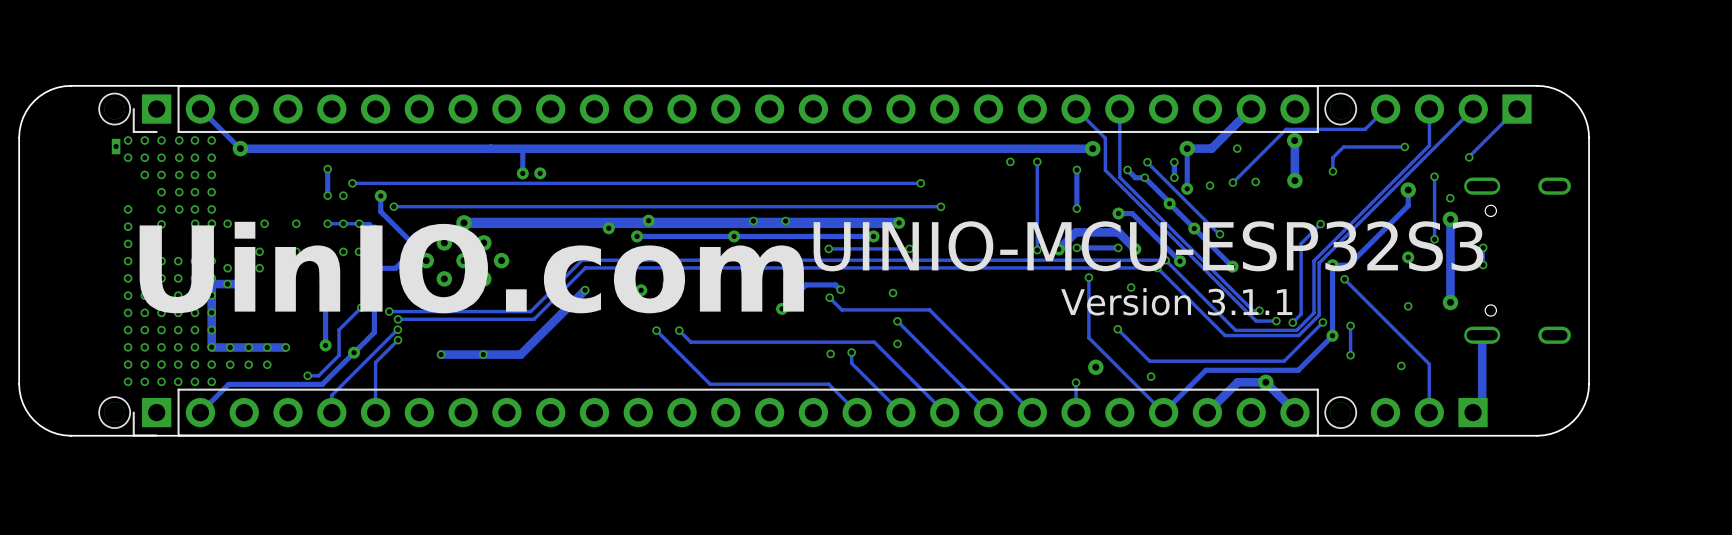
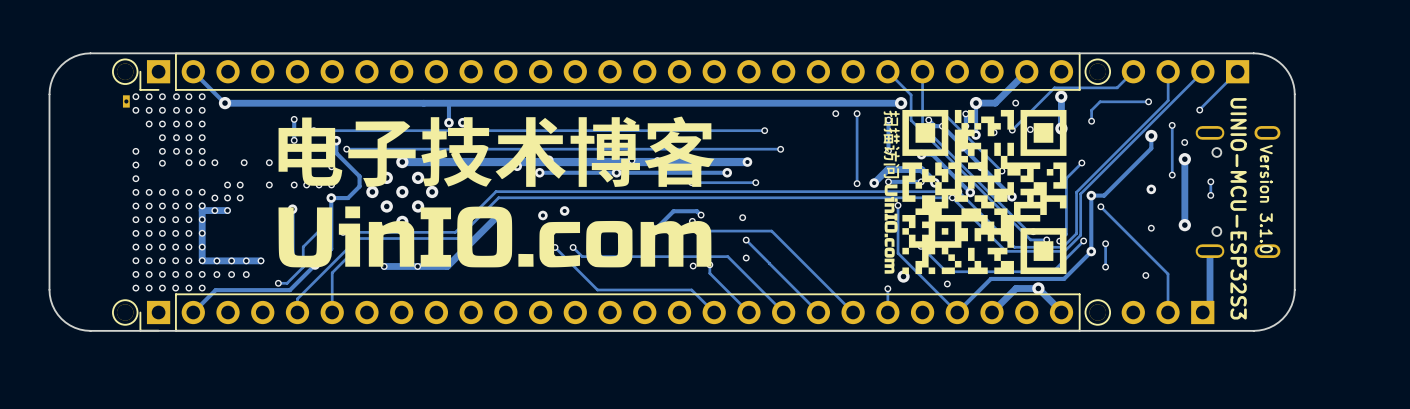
drawing: none -> [883, 109, 1067, 275]
drawing: none -> [278, 116, 715, 268]
text: UINIO-MCU-ESP32S3 (1148, 246) -> none
text: UinIO.com (471, 267) -> none
text: none -> Version 3.1.0 (1266, 199)
text: none -> UINIO-MCU-ESP32S3 (1238, 208)
text: Version 3.1.1 (1176, 301) -> none

